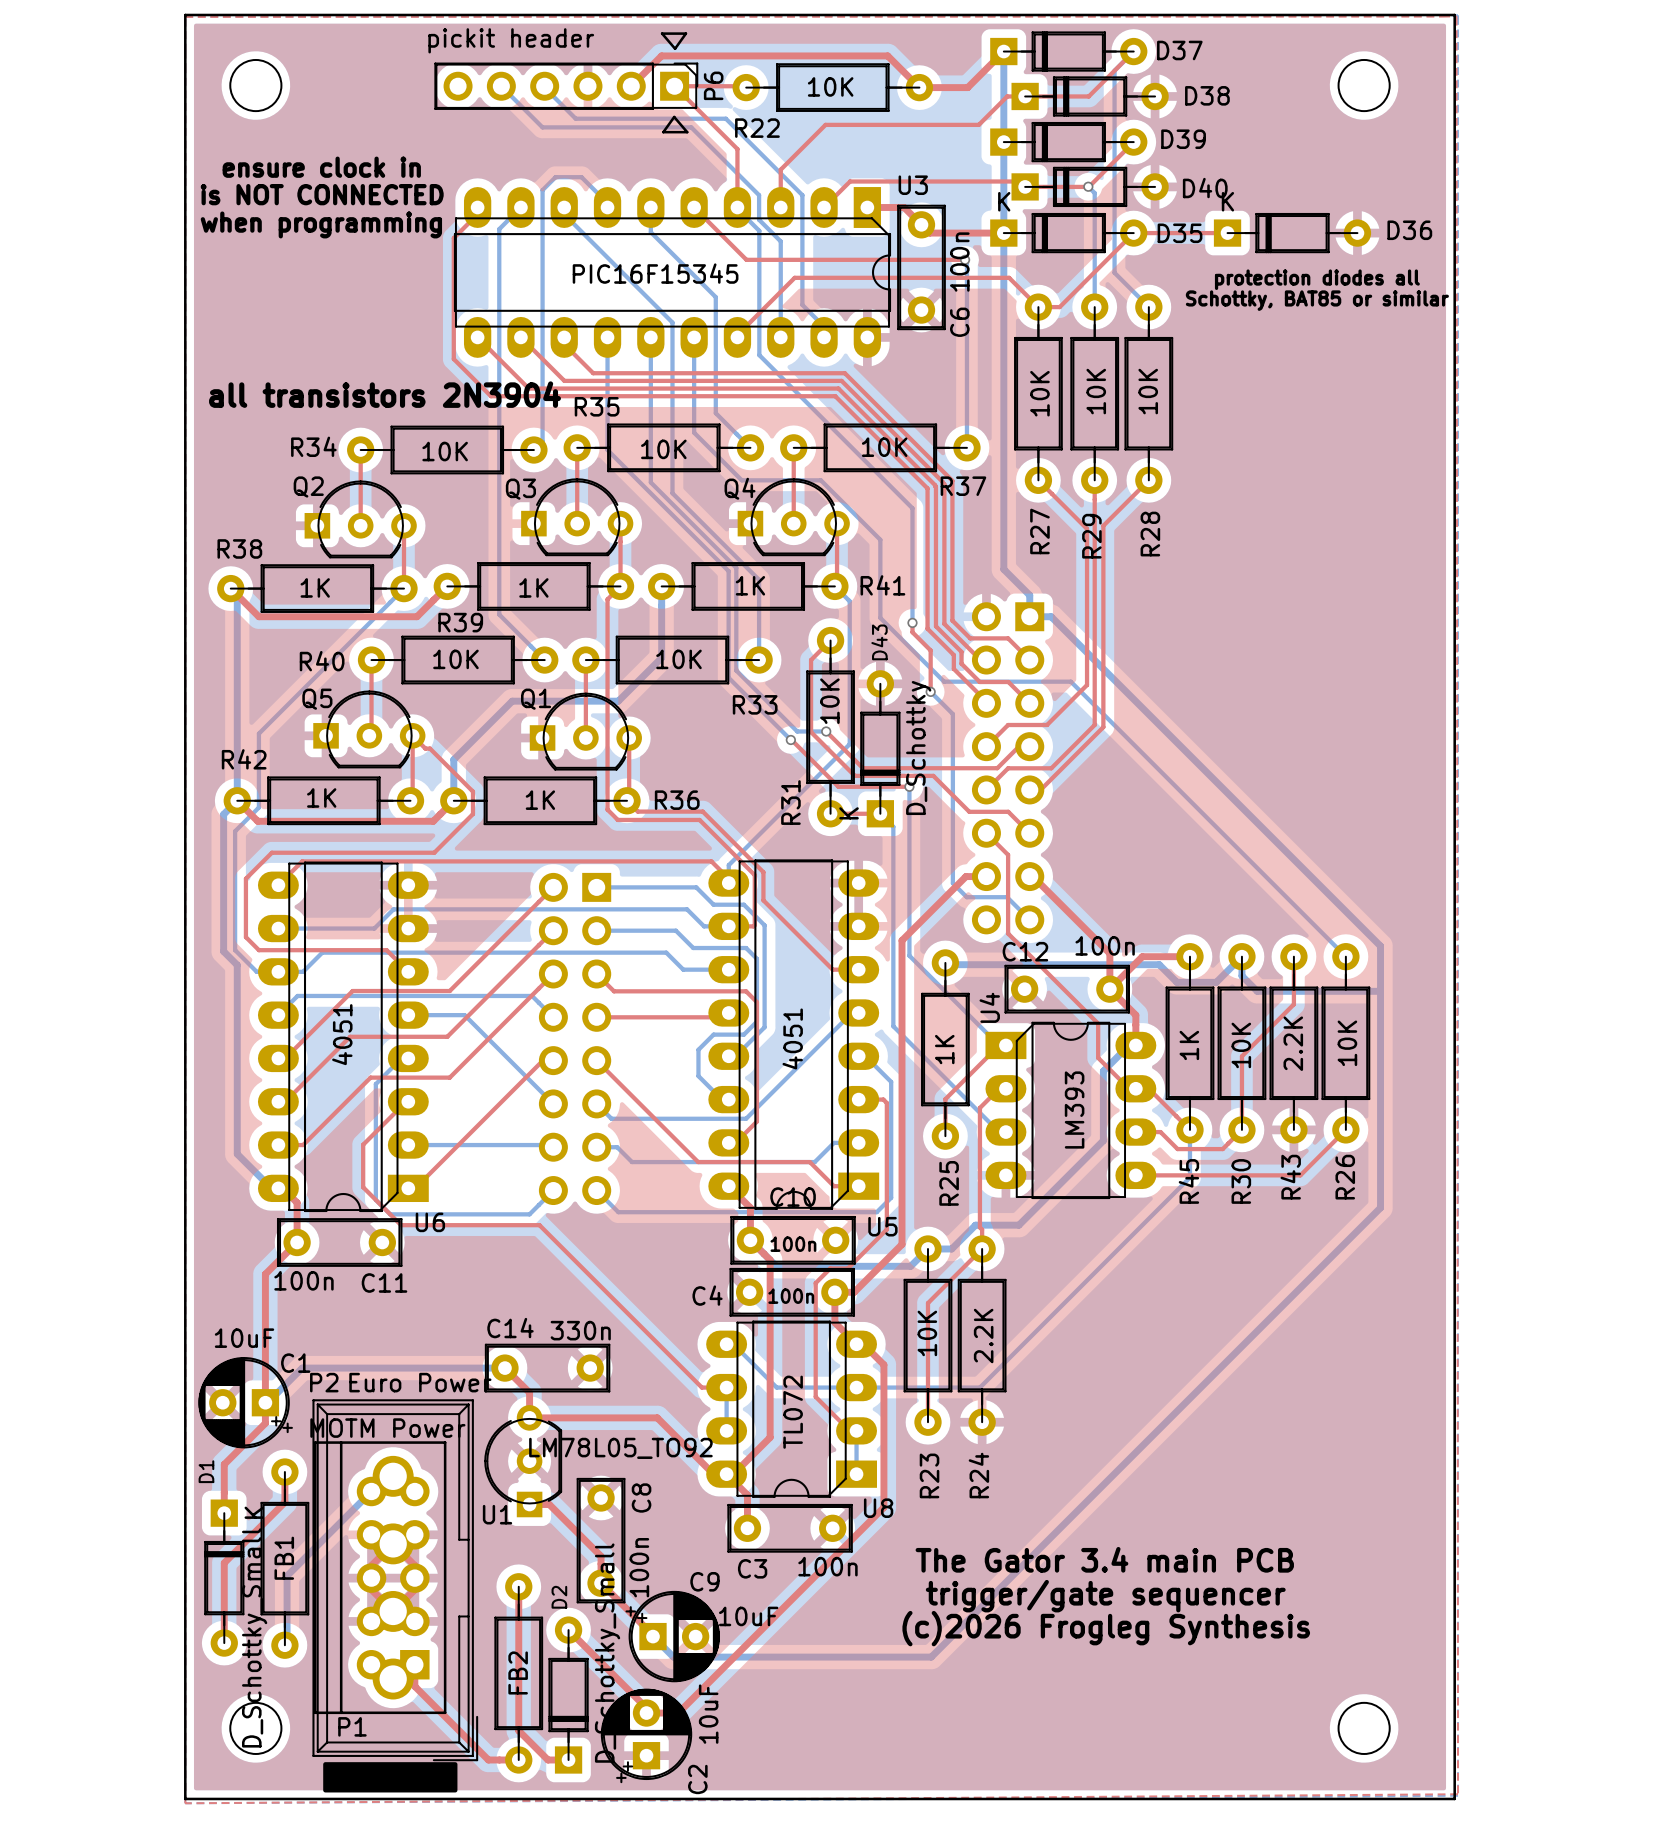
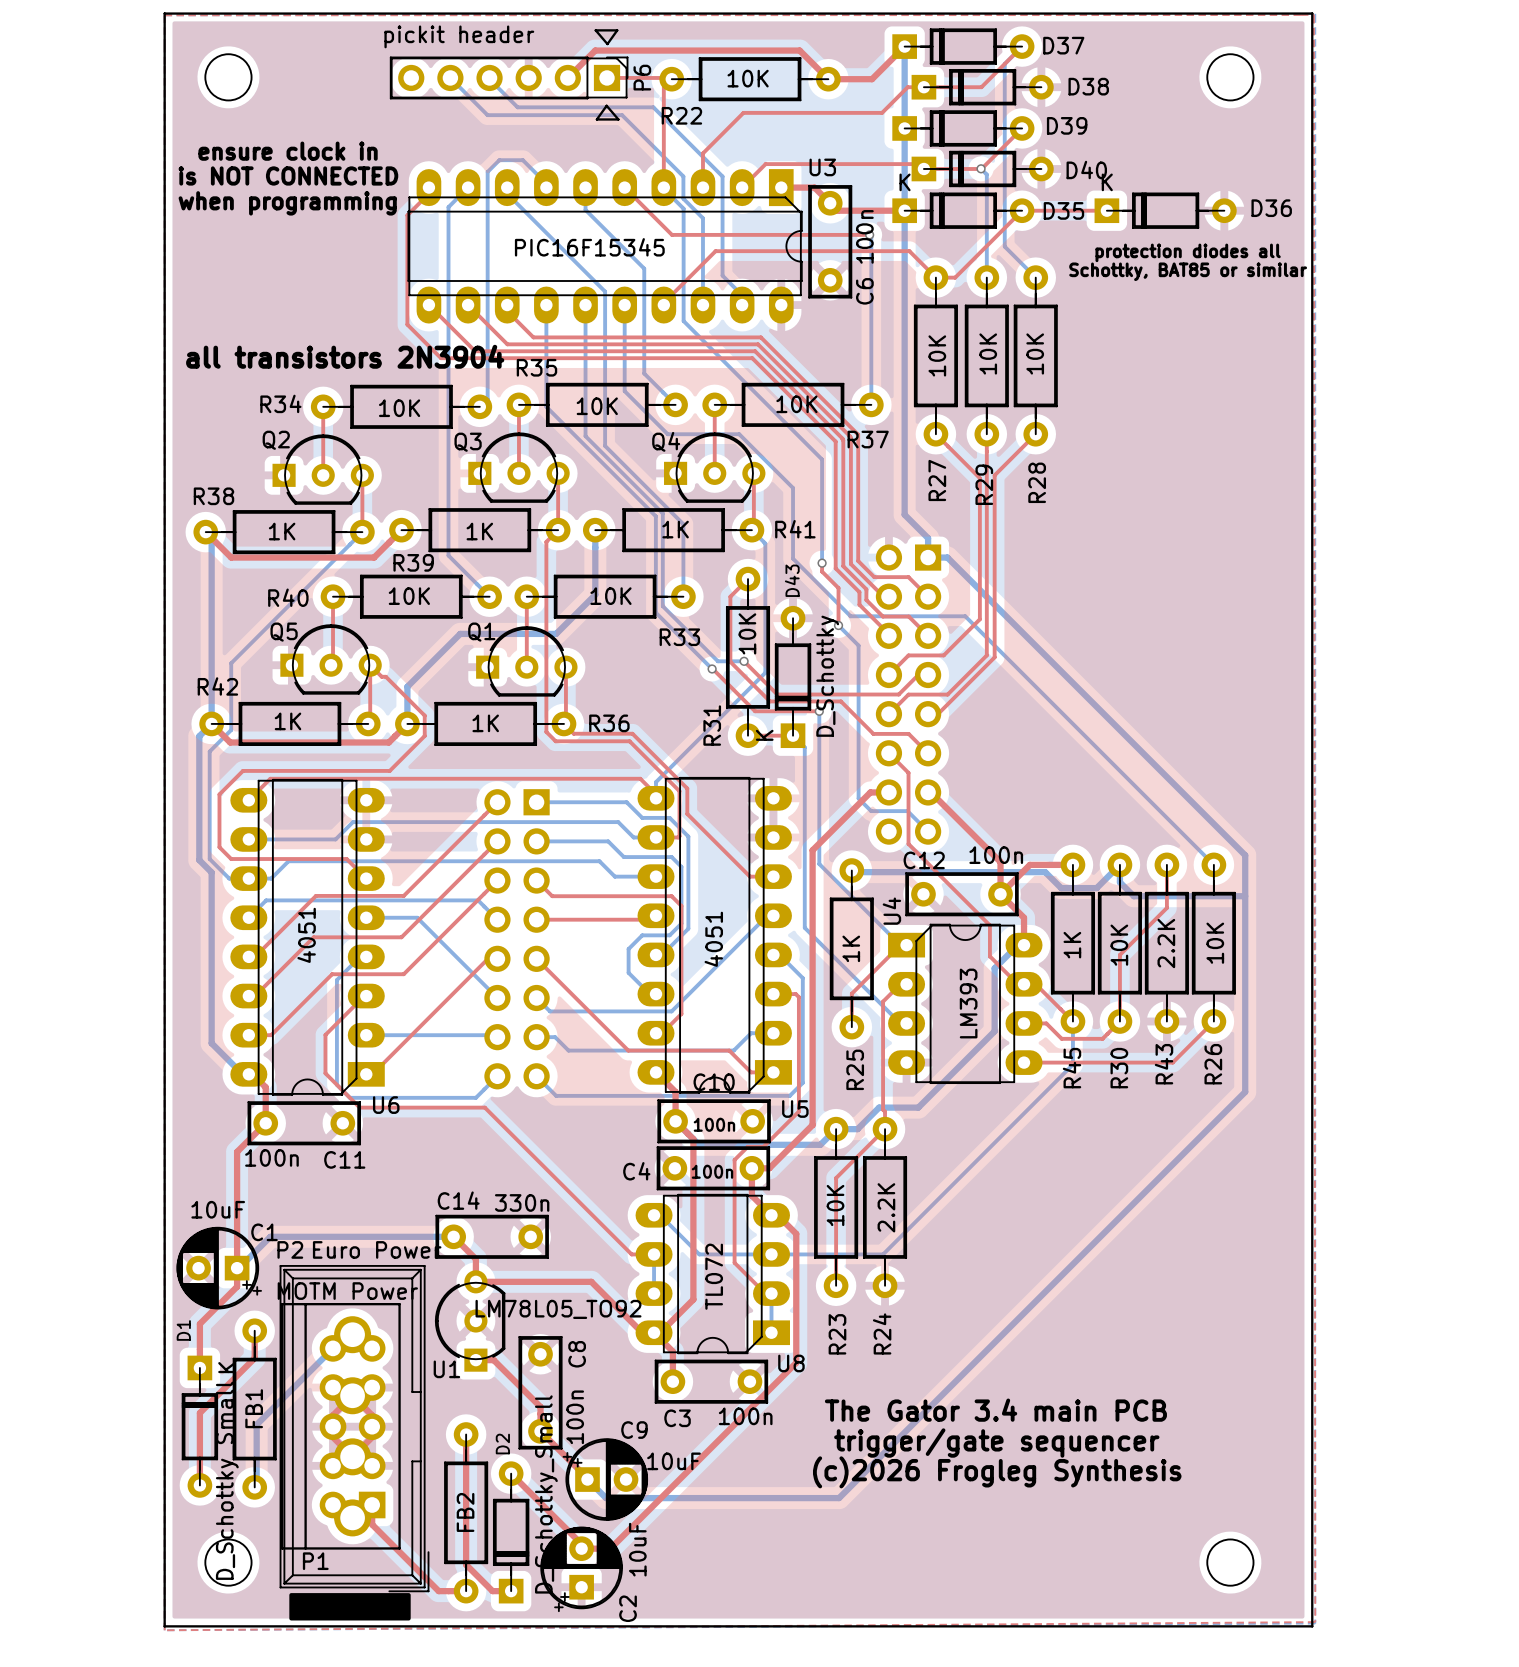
top track: (674, 86) (737, 149) -> (671, 79) (663, 87) (663, 134)

